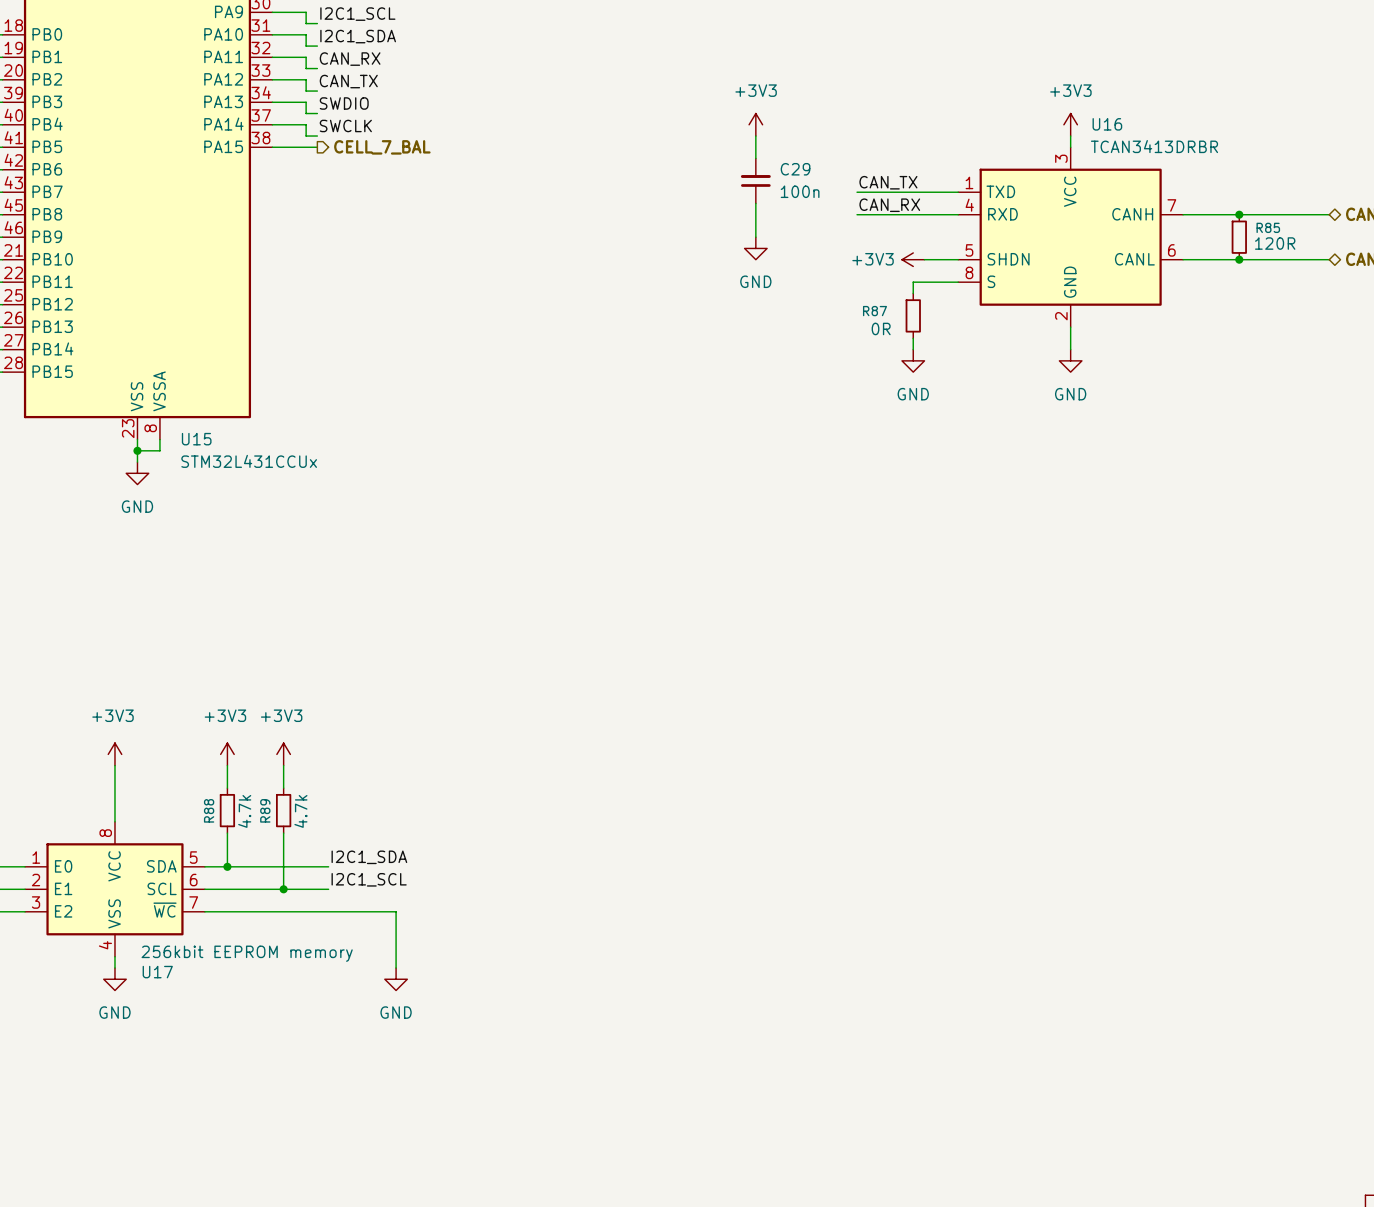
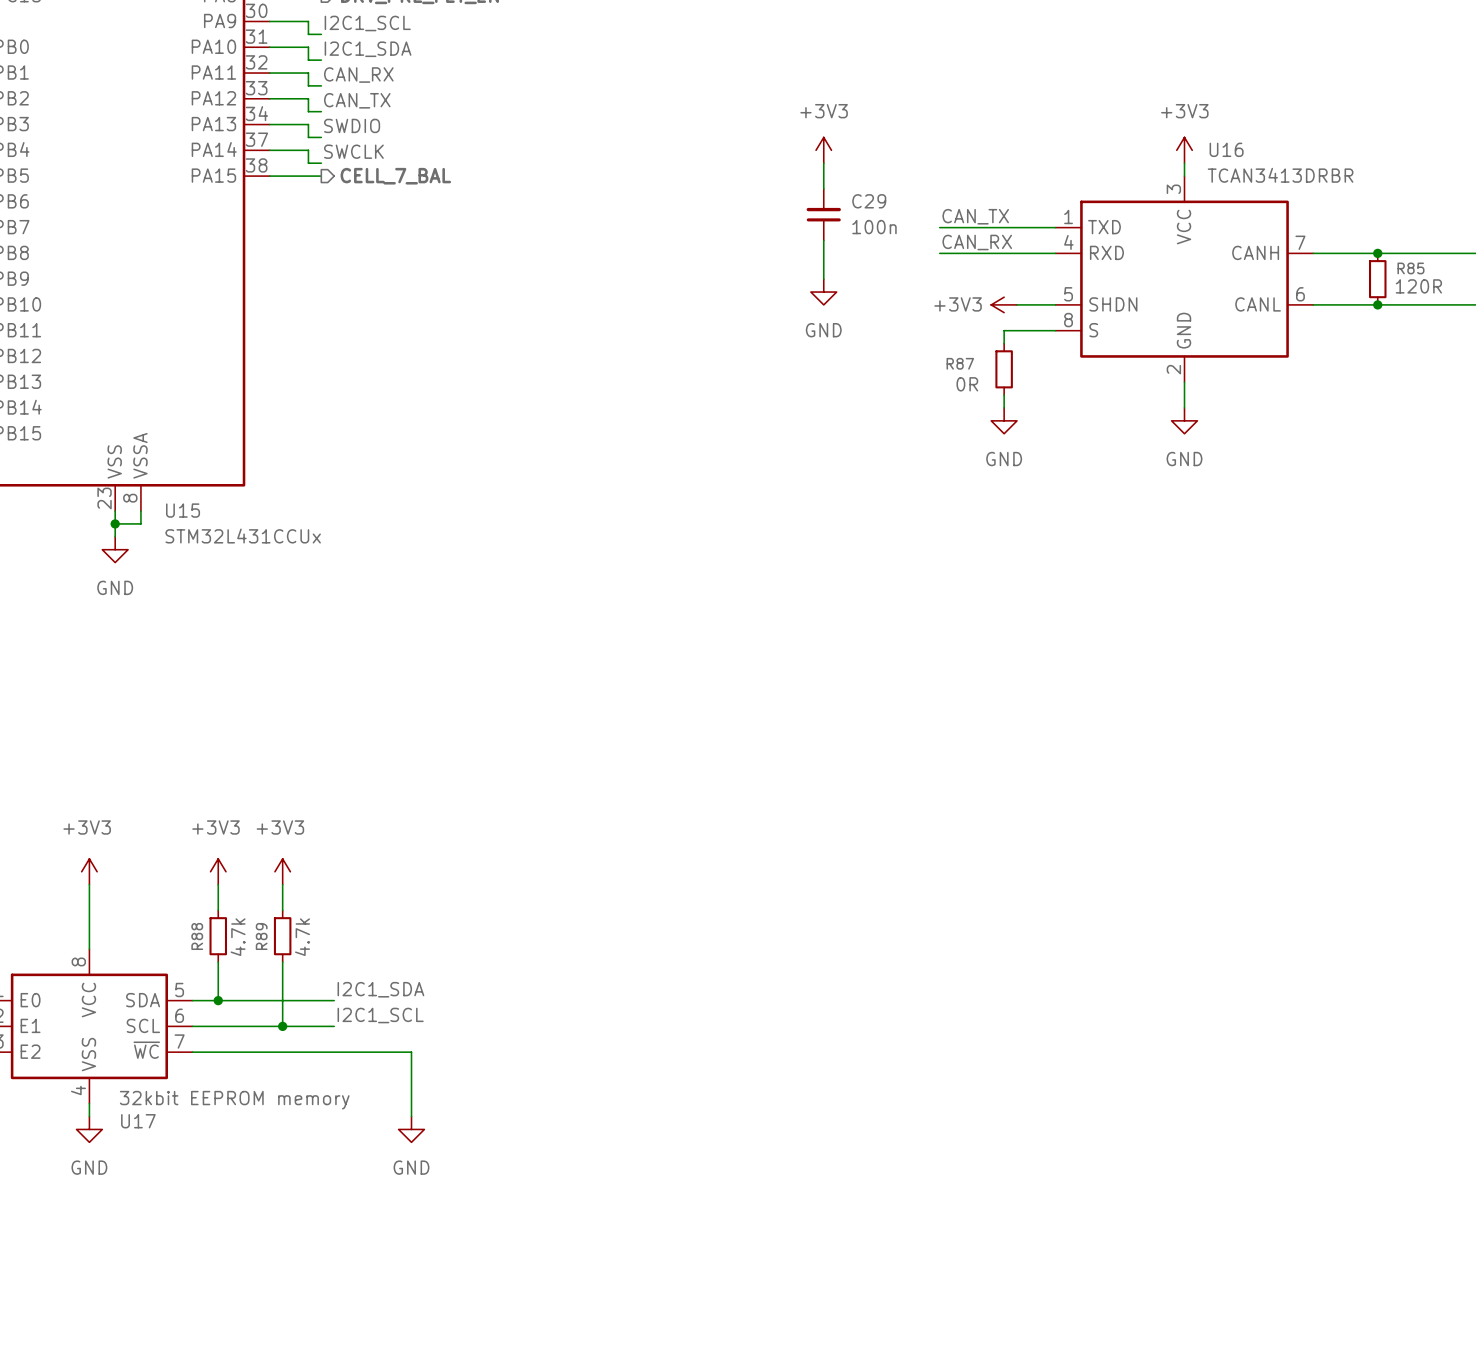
U17 value: 256kbit EEPROM memory (247, 953) -> 32kbit EEPROM memory (234, 1100)

